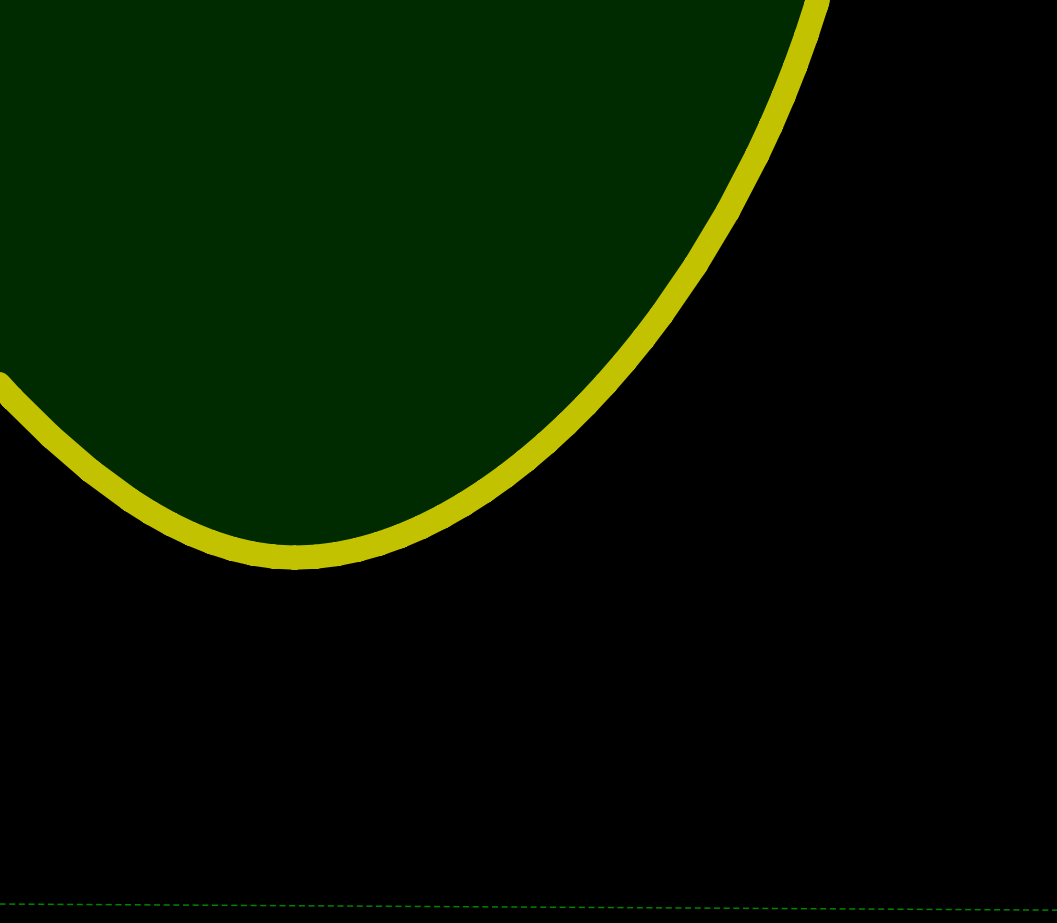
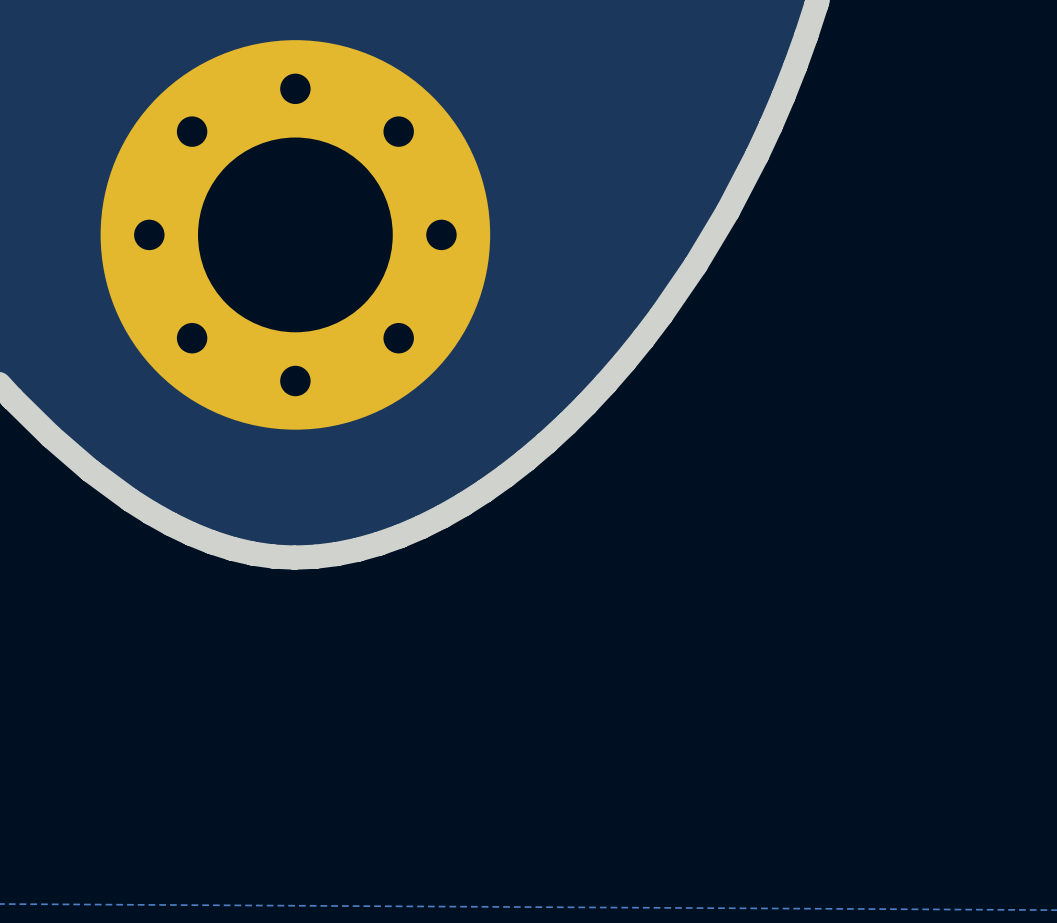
part: none -> (295, 234)

